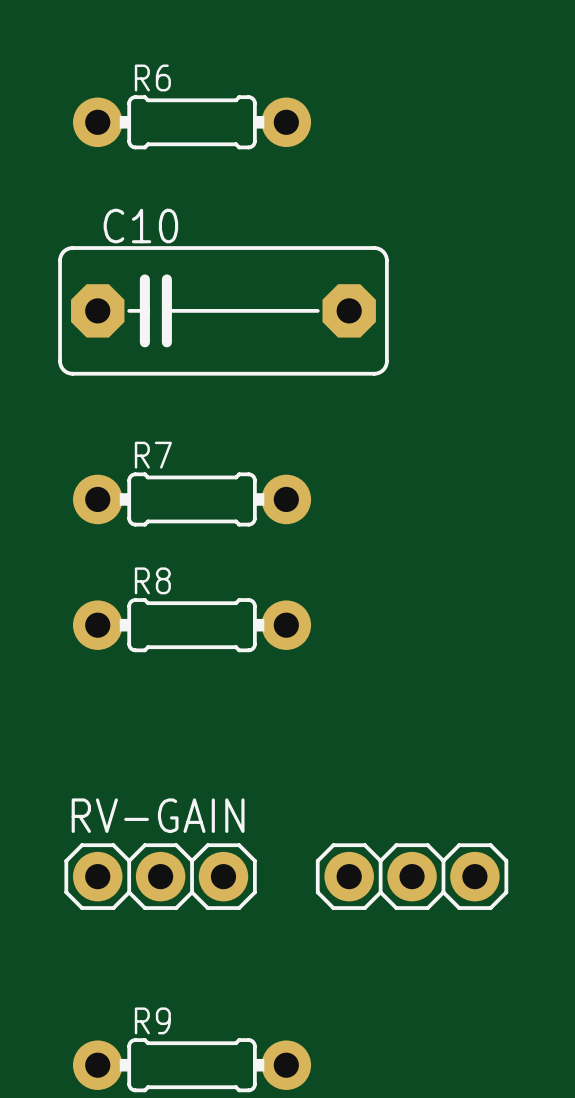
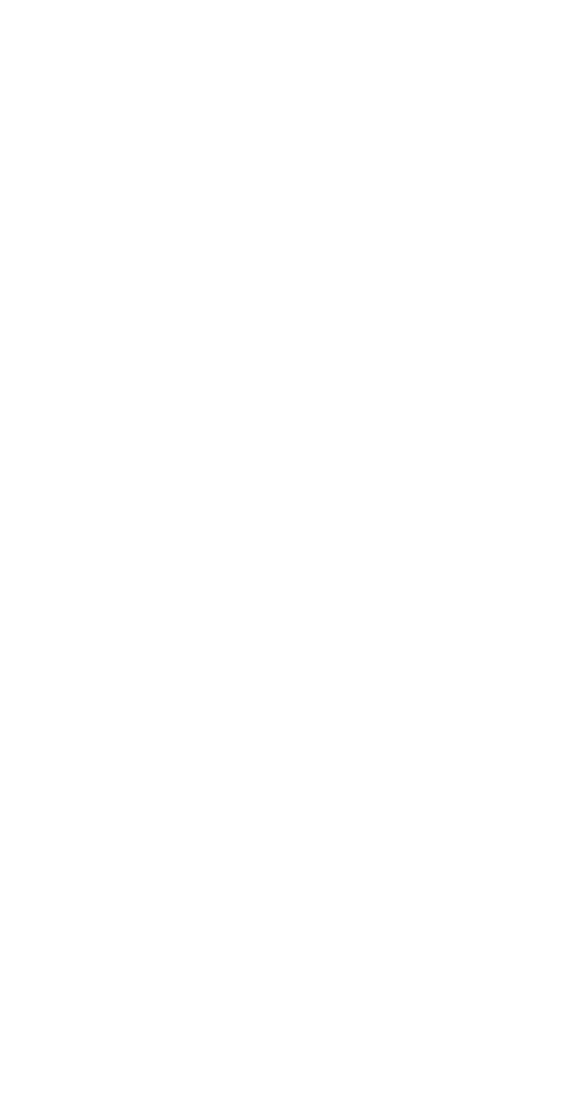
R6: (192, 122) -> none
C10: (223, 310) -> none
R7: (192, 499) -> none
R8: (192, 625) -> none
RV-GAIN: (286, 876) -> none
R9: (192, 1065) -> none

